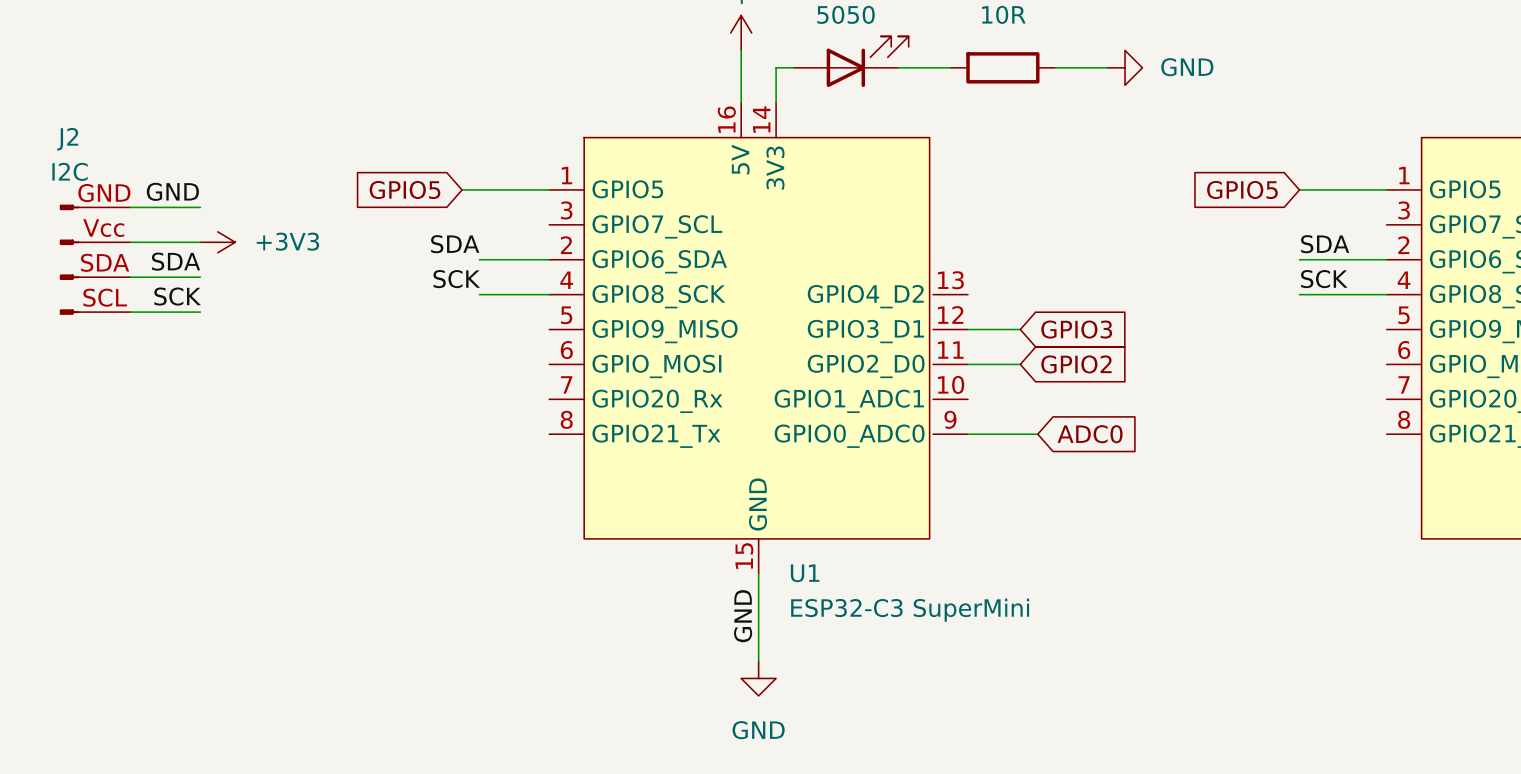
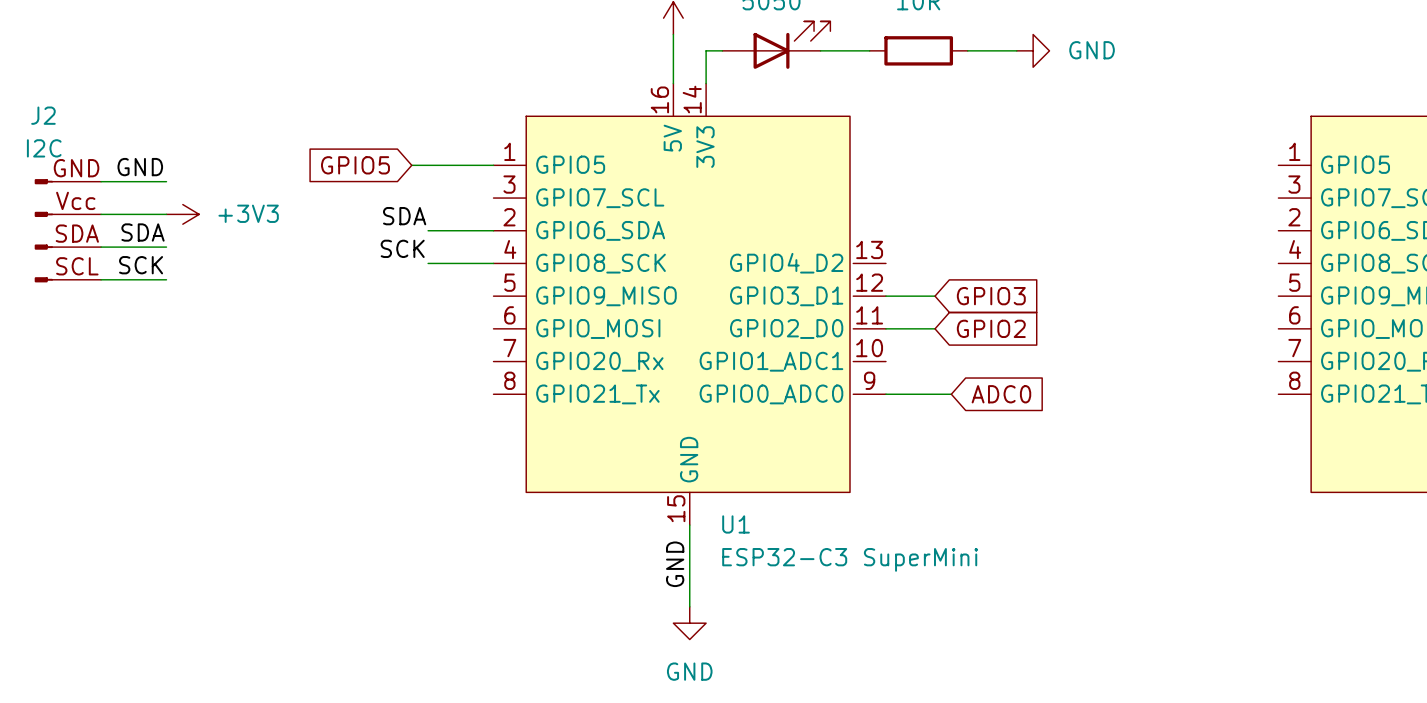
global label: GPIO5 (1242, 189) -> none
wire: (1299, 189) (1386, 189) -> none
label: SDA (1325, 244) -> none
wire: (1299, 259) (1386, 259) -> none
label: SCK (1324, 279) -> none
wire: (1299, 294) (1386, 294) -> none

